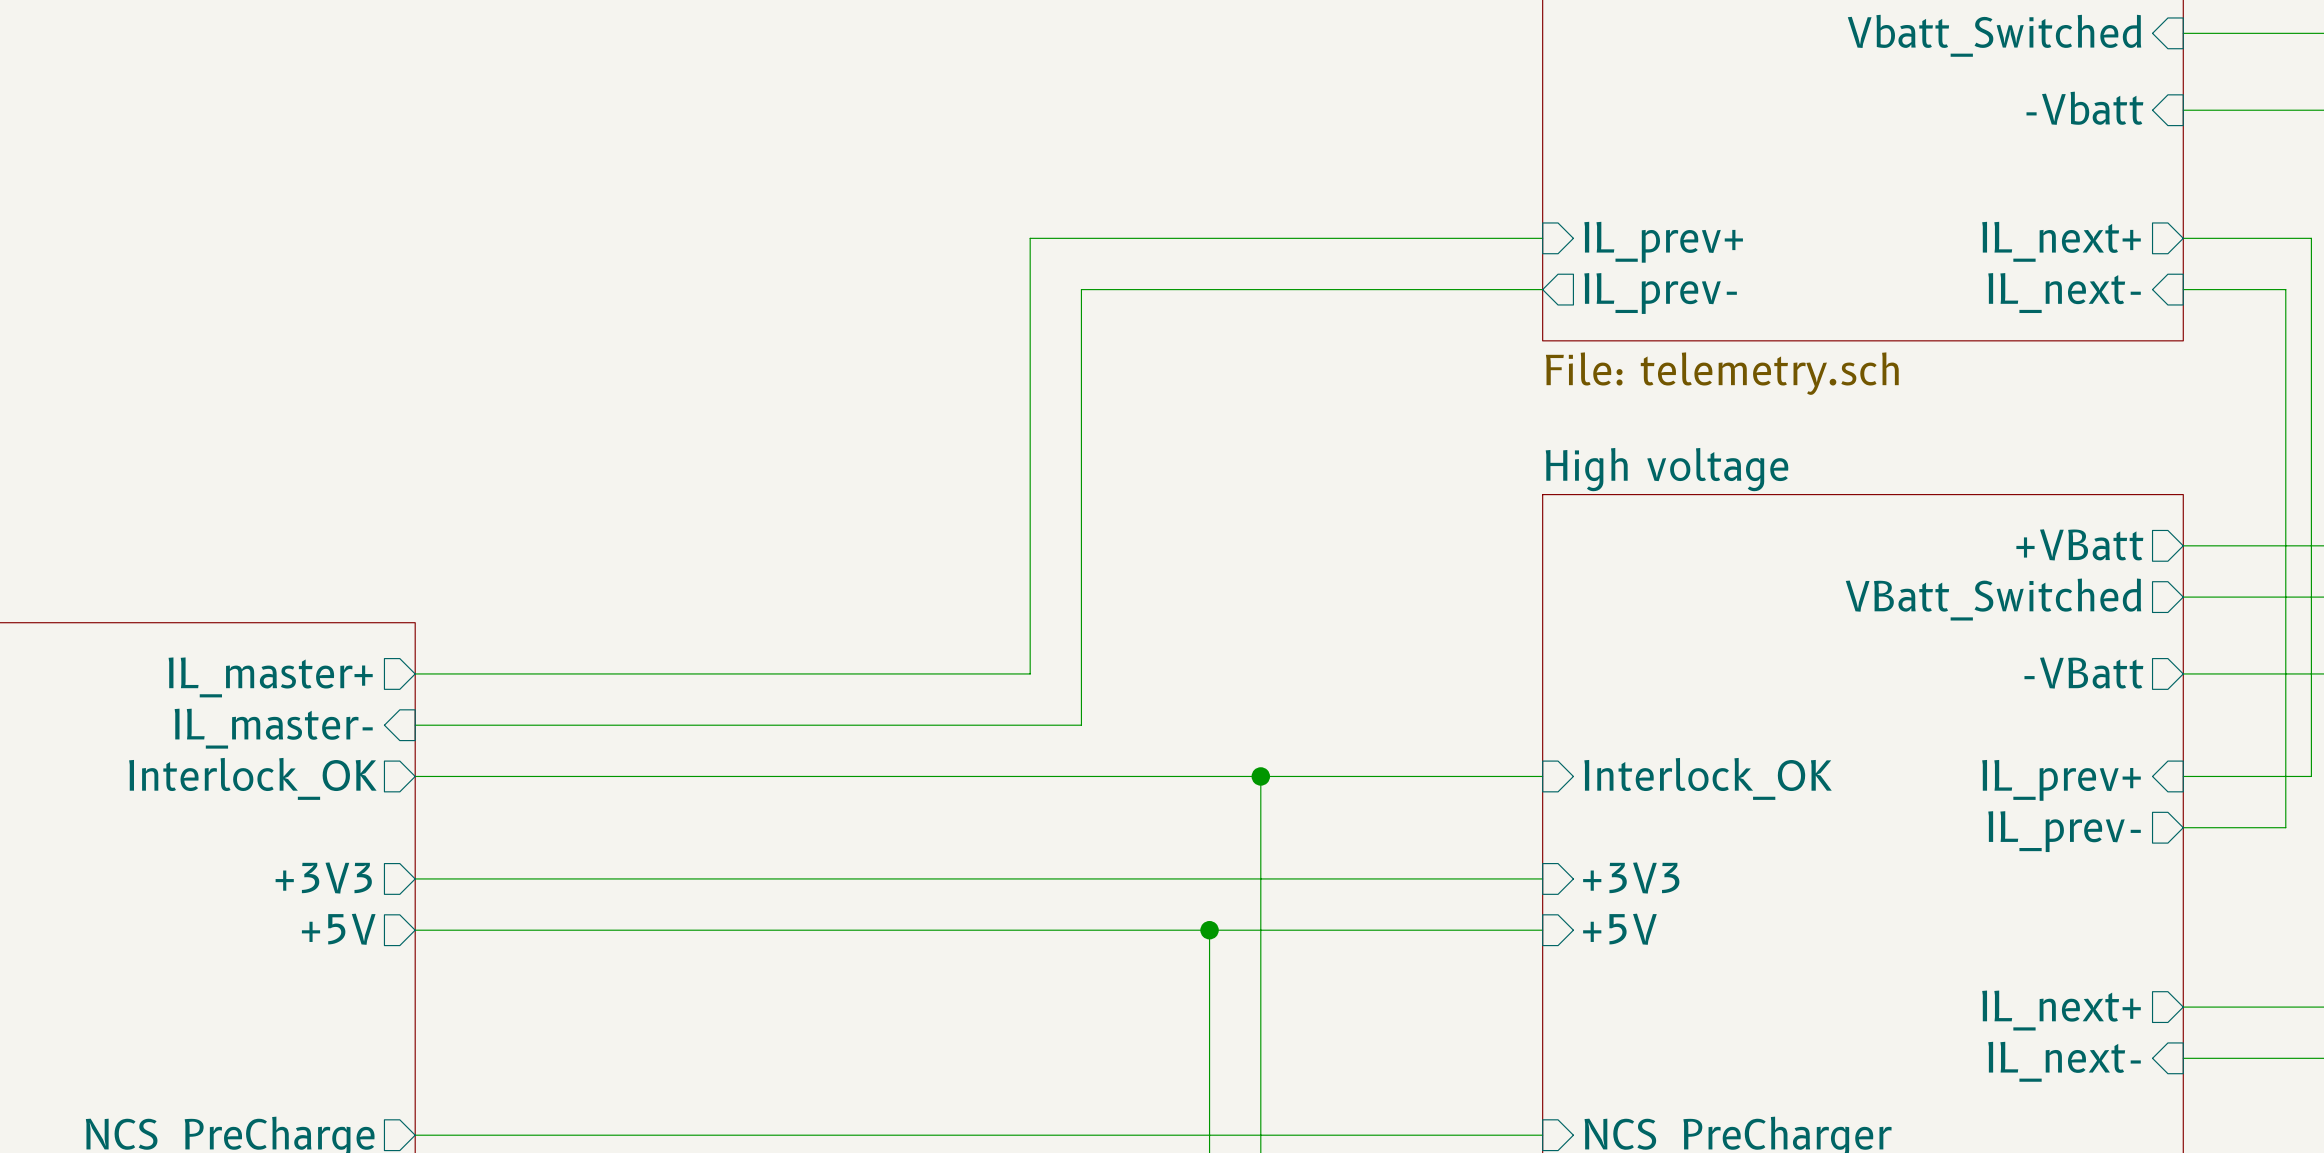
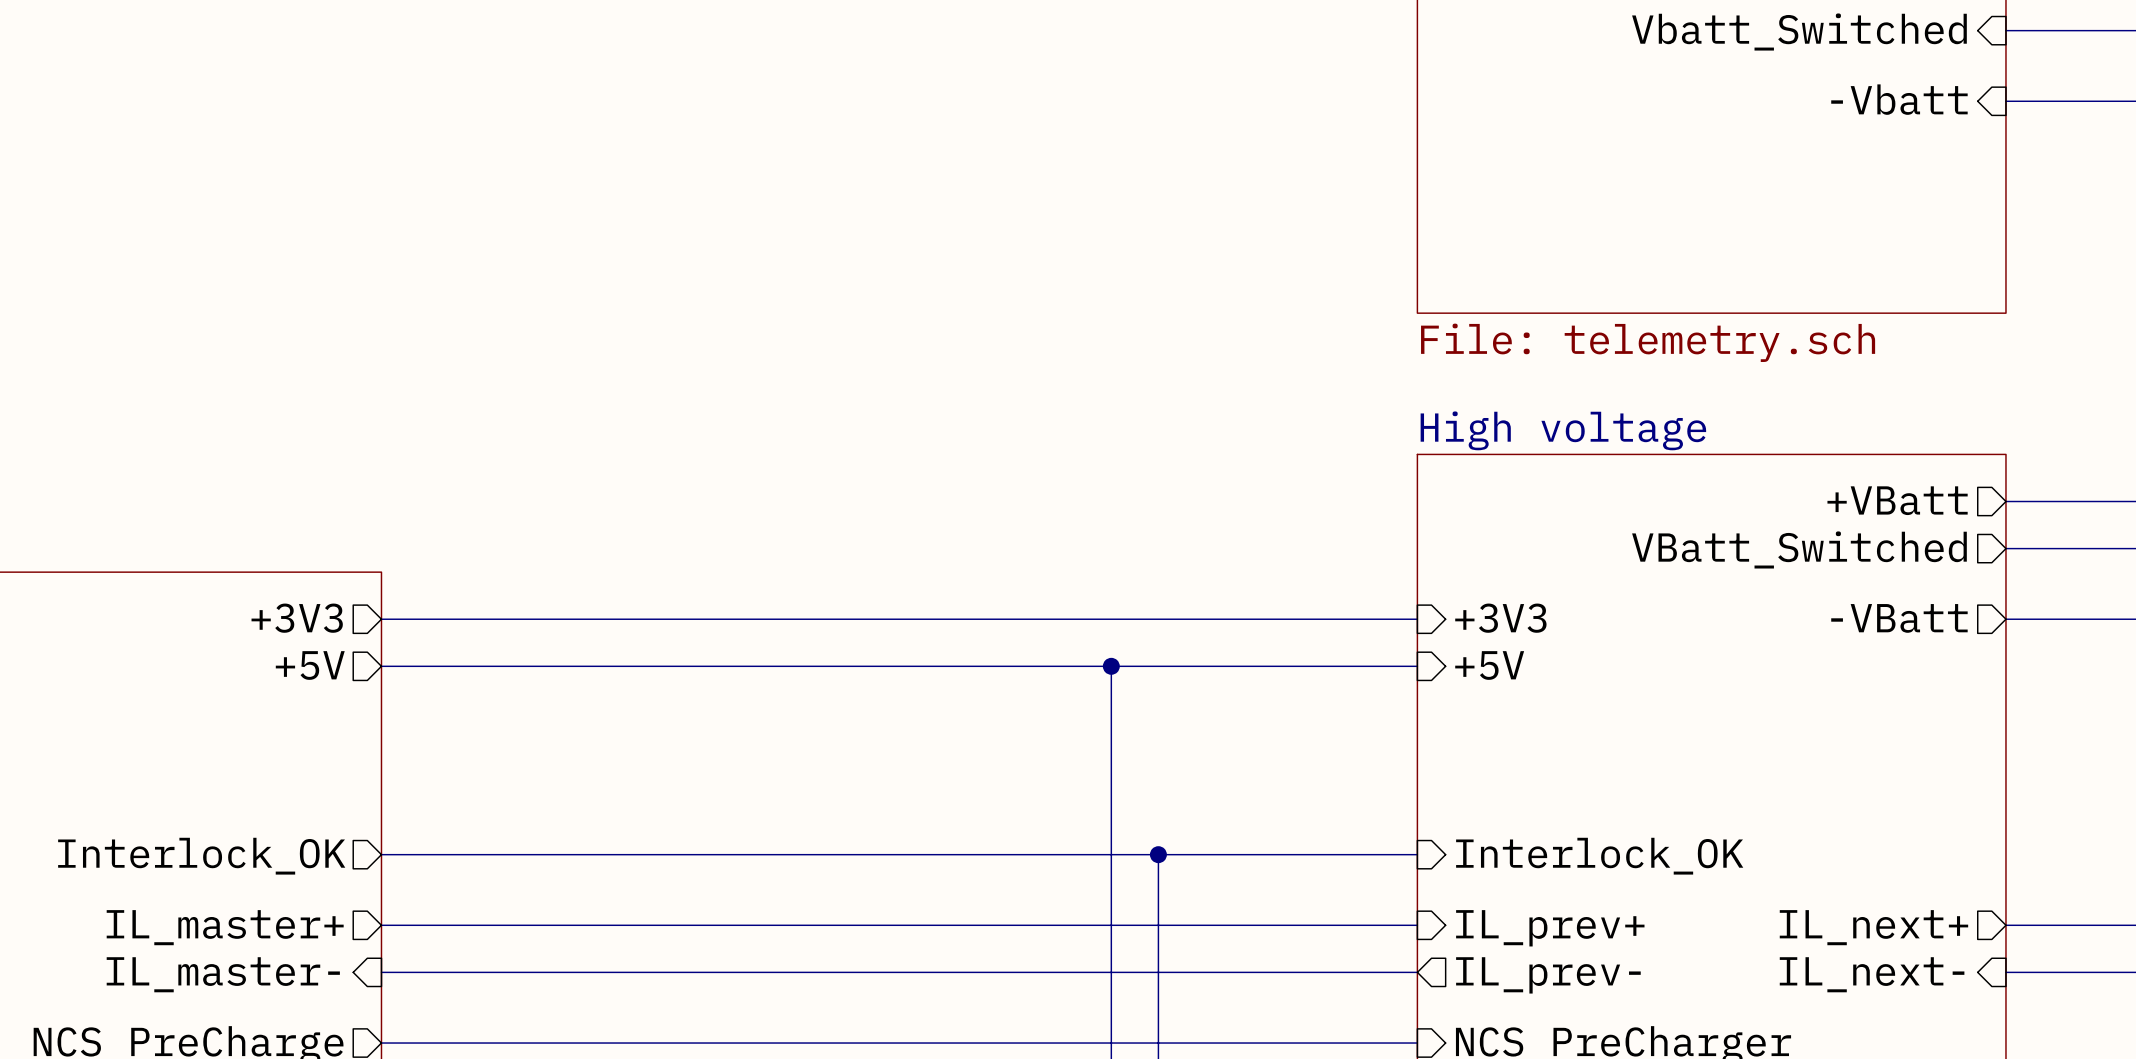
wire: (1542, 238) (1030, 238) (1030, 673) -> (1417, 619) (946, 619)
wire: (2183, 238) (2311, 238) (2311, 776) (2183, 776) -> none
sheet pin: IL_next+ (2061, 241) -> none
sheet pin: IL_prev+ (1663, 242) -> none
wire: (1542, 289) (1081, 289) (1081, 725) -> (1417, 666) (993, 666)
wire: (2183, 289) (2285, 289) (2285, 827) (2183, 827) -> none
sheet pin: IL_prev- (1660, 293) -> none
sheet pin: IL_next- (2064, 293) -> none
sheet pin: IL_master+ (270, 677) -> +3V3 (297, 618)
sheet pin: none -> +5V (1489, 665)
wire: none -> (1111, 666) (1111, 854)
sheet pin shape: input (273, 728) -> output (310, 665)
sheet pin: IL_master- (273, 728) -> +5V (310, 665)
wire: (415, 776) (1542, 776) -> (381, 972) (1417, 972)
wire: (1260, 776) (1260, 930) -> none
junction position: (1260, 776) -> (1111, 666)
sheet pin: Interlock_OK (252, 778) -> none
sheet pin: Interlock_OK (1708, 778) -> none
sheet pin: IL_prev+ (2061, 780) -> none
sheet pin: IL_prev- (2064, 831) -> none
sheet pin: +3V3 (323, 878) -> none
wire: (415, 878) (1542, 878) -> (381, 925) (1417, 925)
sheet pin position: +3V3 (1631, 878) -> +3V3 (1500, 618)
sheet pin: +5V (338, 929) -> Interlock_OK (201, 856)
sheet pin: +5V (1619, 929) -> Interlock_OK (1599, 856)
junction position: (1209, 930) -> (1158, 854)
sheet pin: none -> IL_master+ (225, 927)
sheet pin: none -> IL_prev+ (1550, 928)
sheet pin: none -> IL_master- (223, 974)
sheet pin: none -> IL_prev- (1548, 975)

